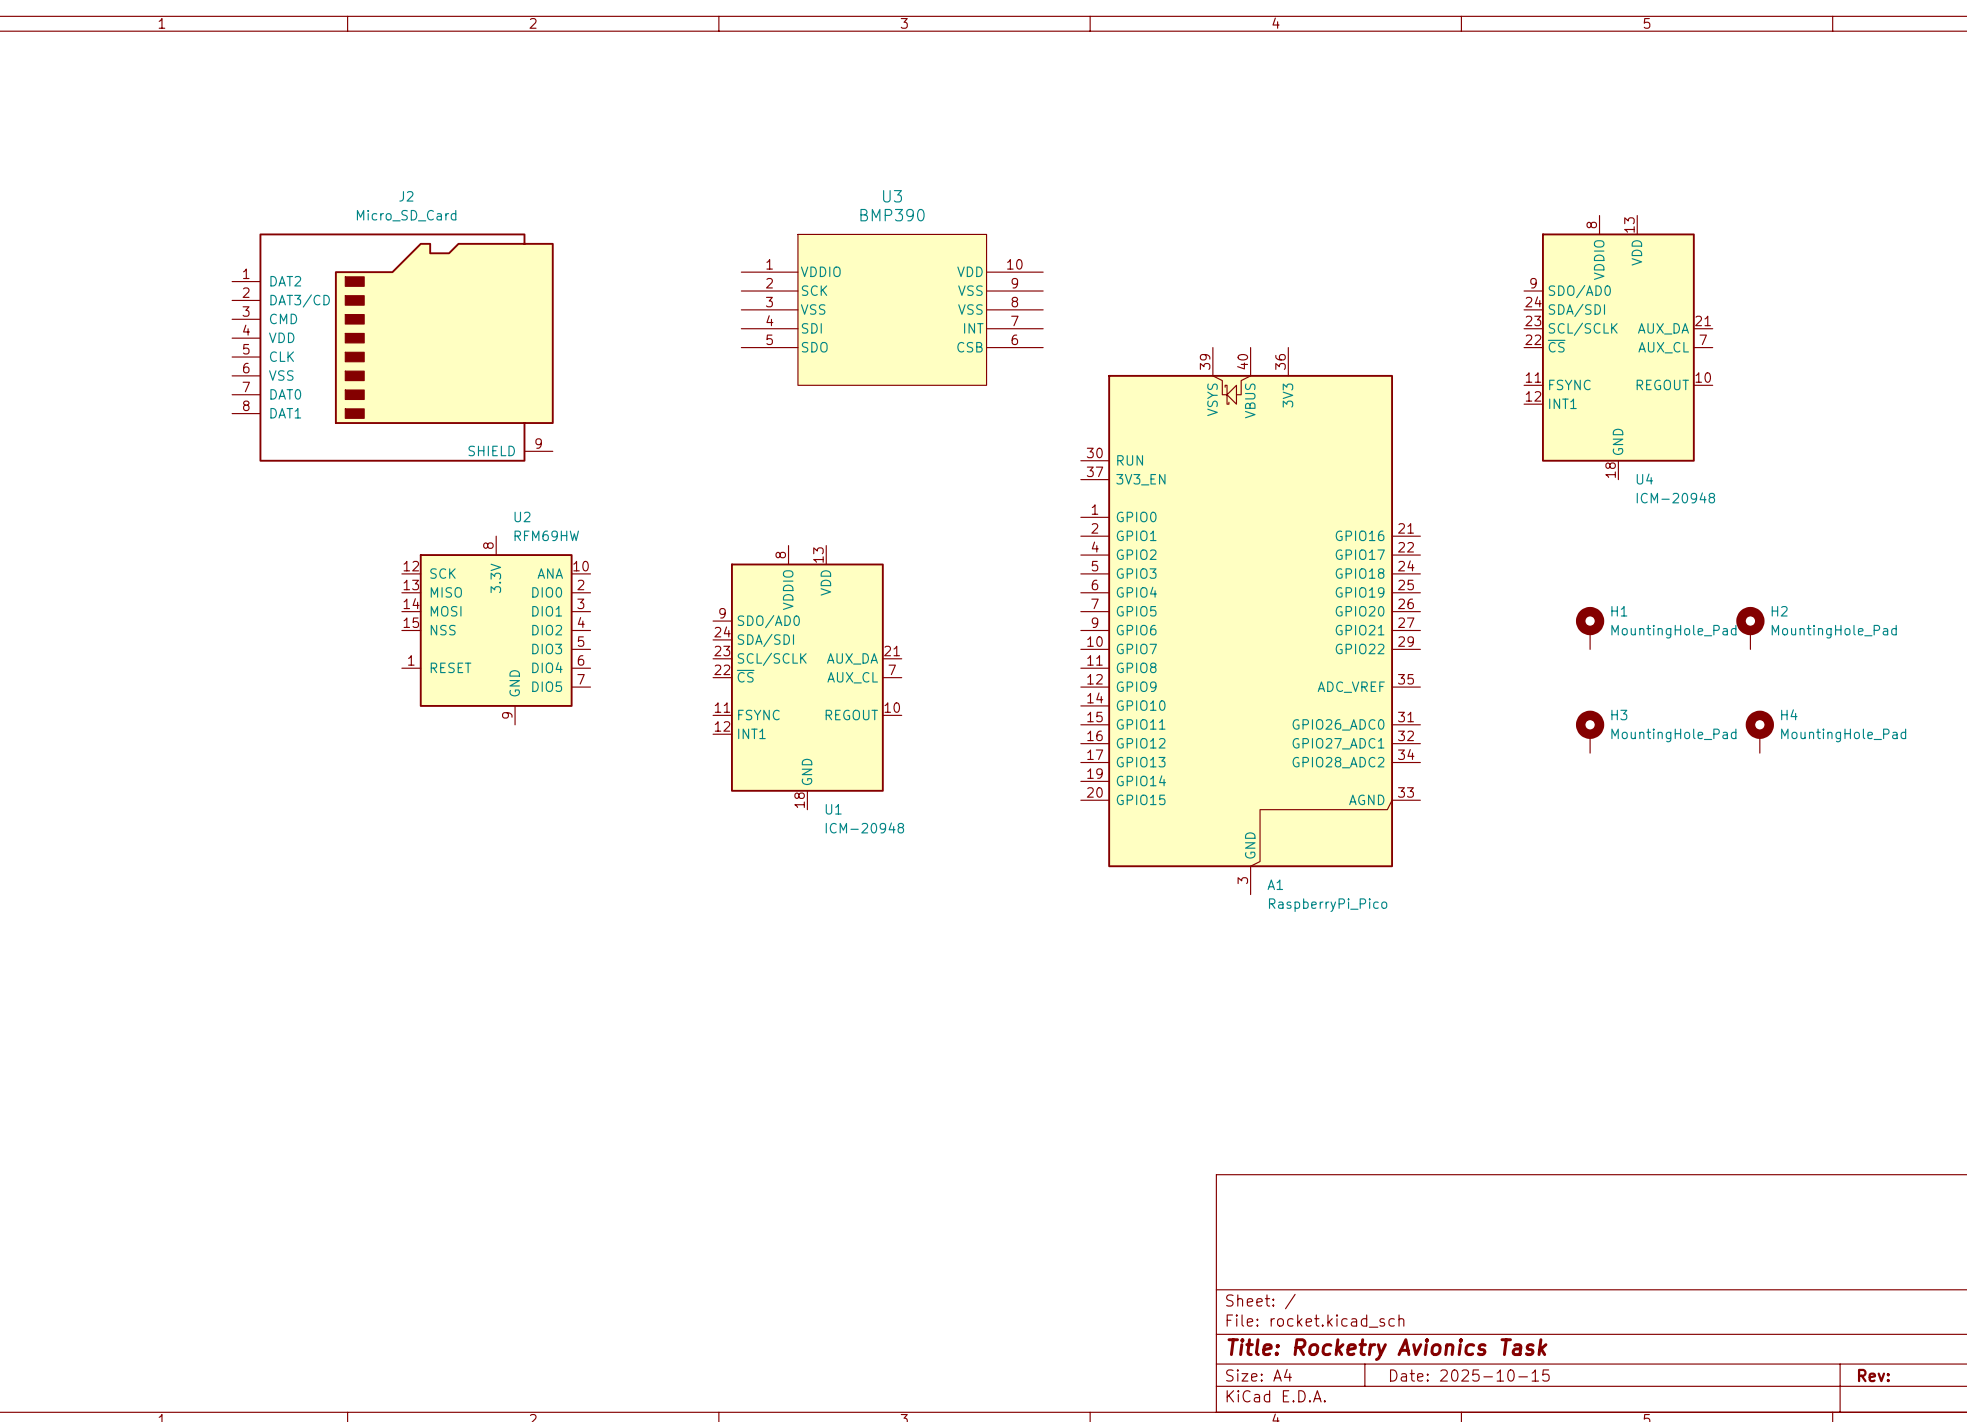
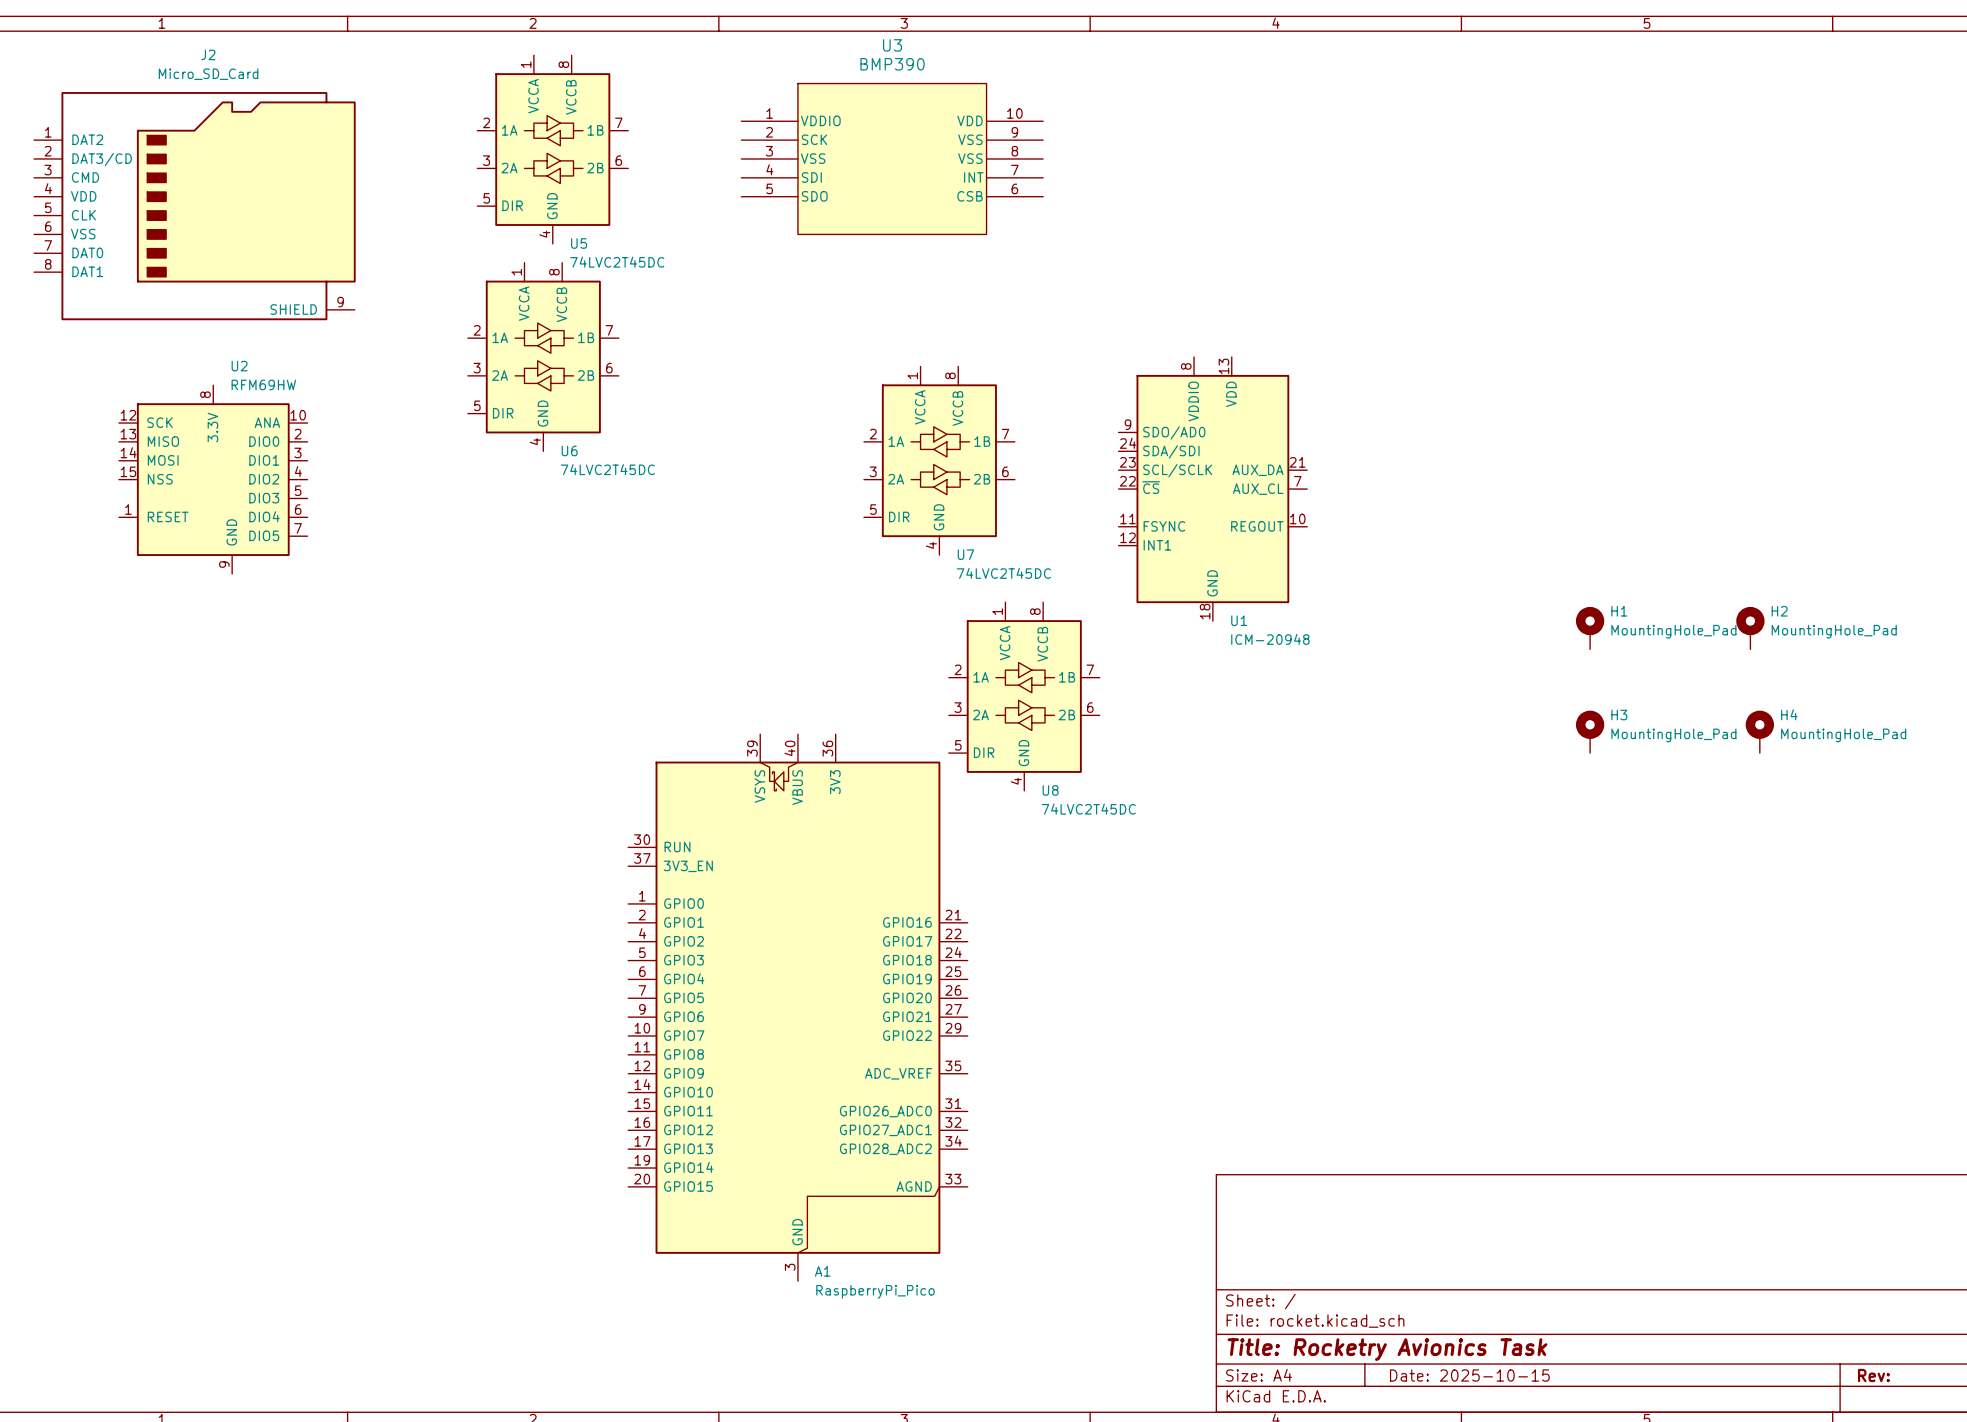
U5: none -> 74LVC2T45DC (552, 149)
U3 position: (892, 309) -> (892, 158)
J2 position: (392, 347) -> (194, 206)
U4: ICM-20948 (1618, 347) -> none
U6: none -> 74LVC2T45DC (543, 357)
U7: none -> 74LVC2T45DC (939, 460)
A1 position: (1250, 621) -> (797, 1007)
U2 position: (496, 630) -> (213, 479)
U1 position: (807, 677) -> (1212, 489)
U8: none -> 74LVC2T45DC (1024, 696)

